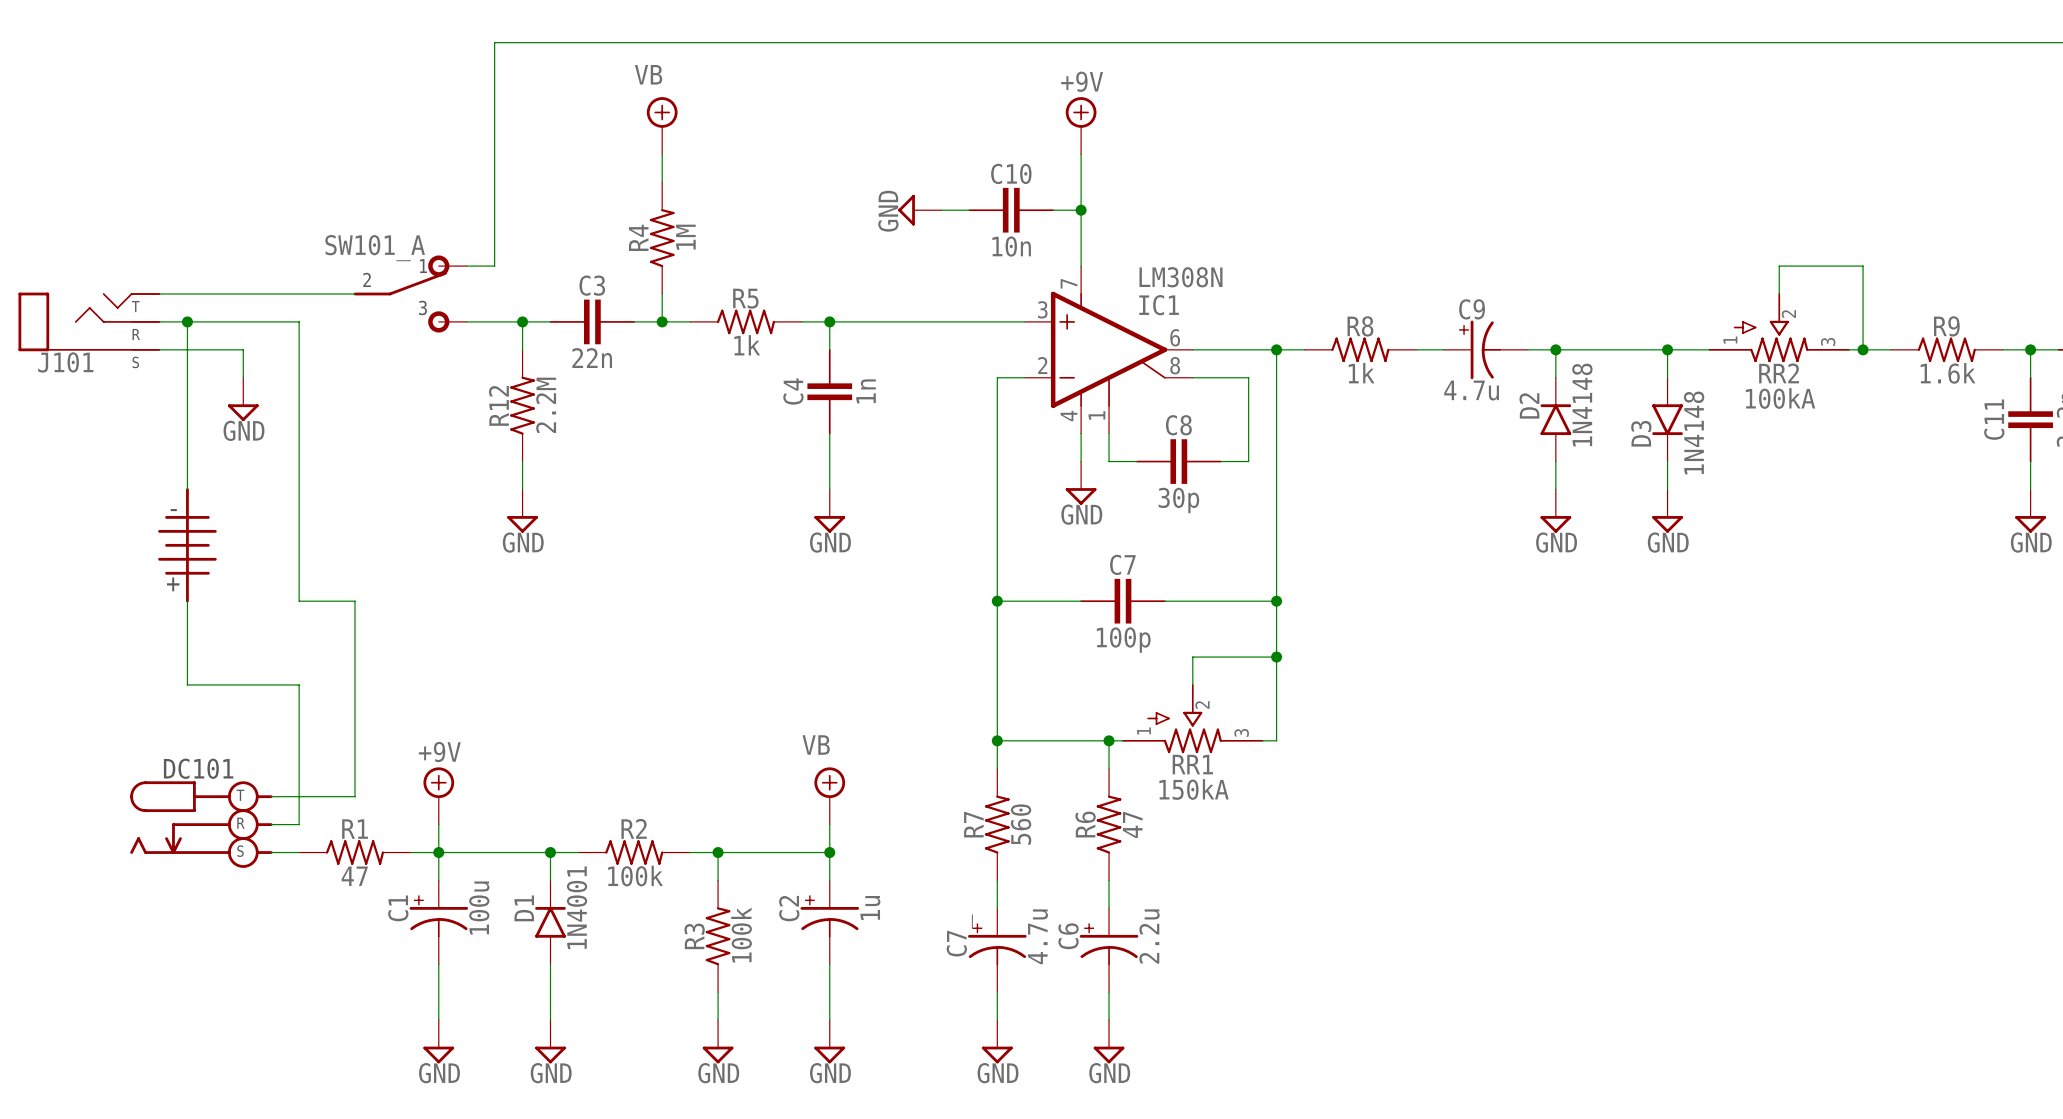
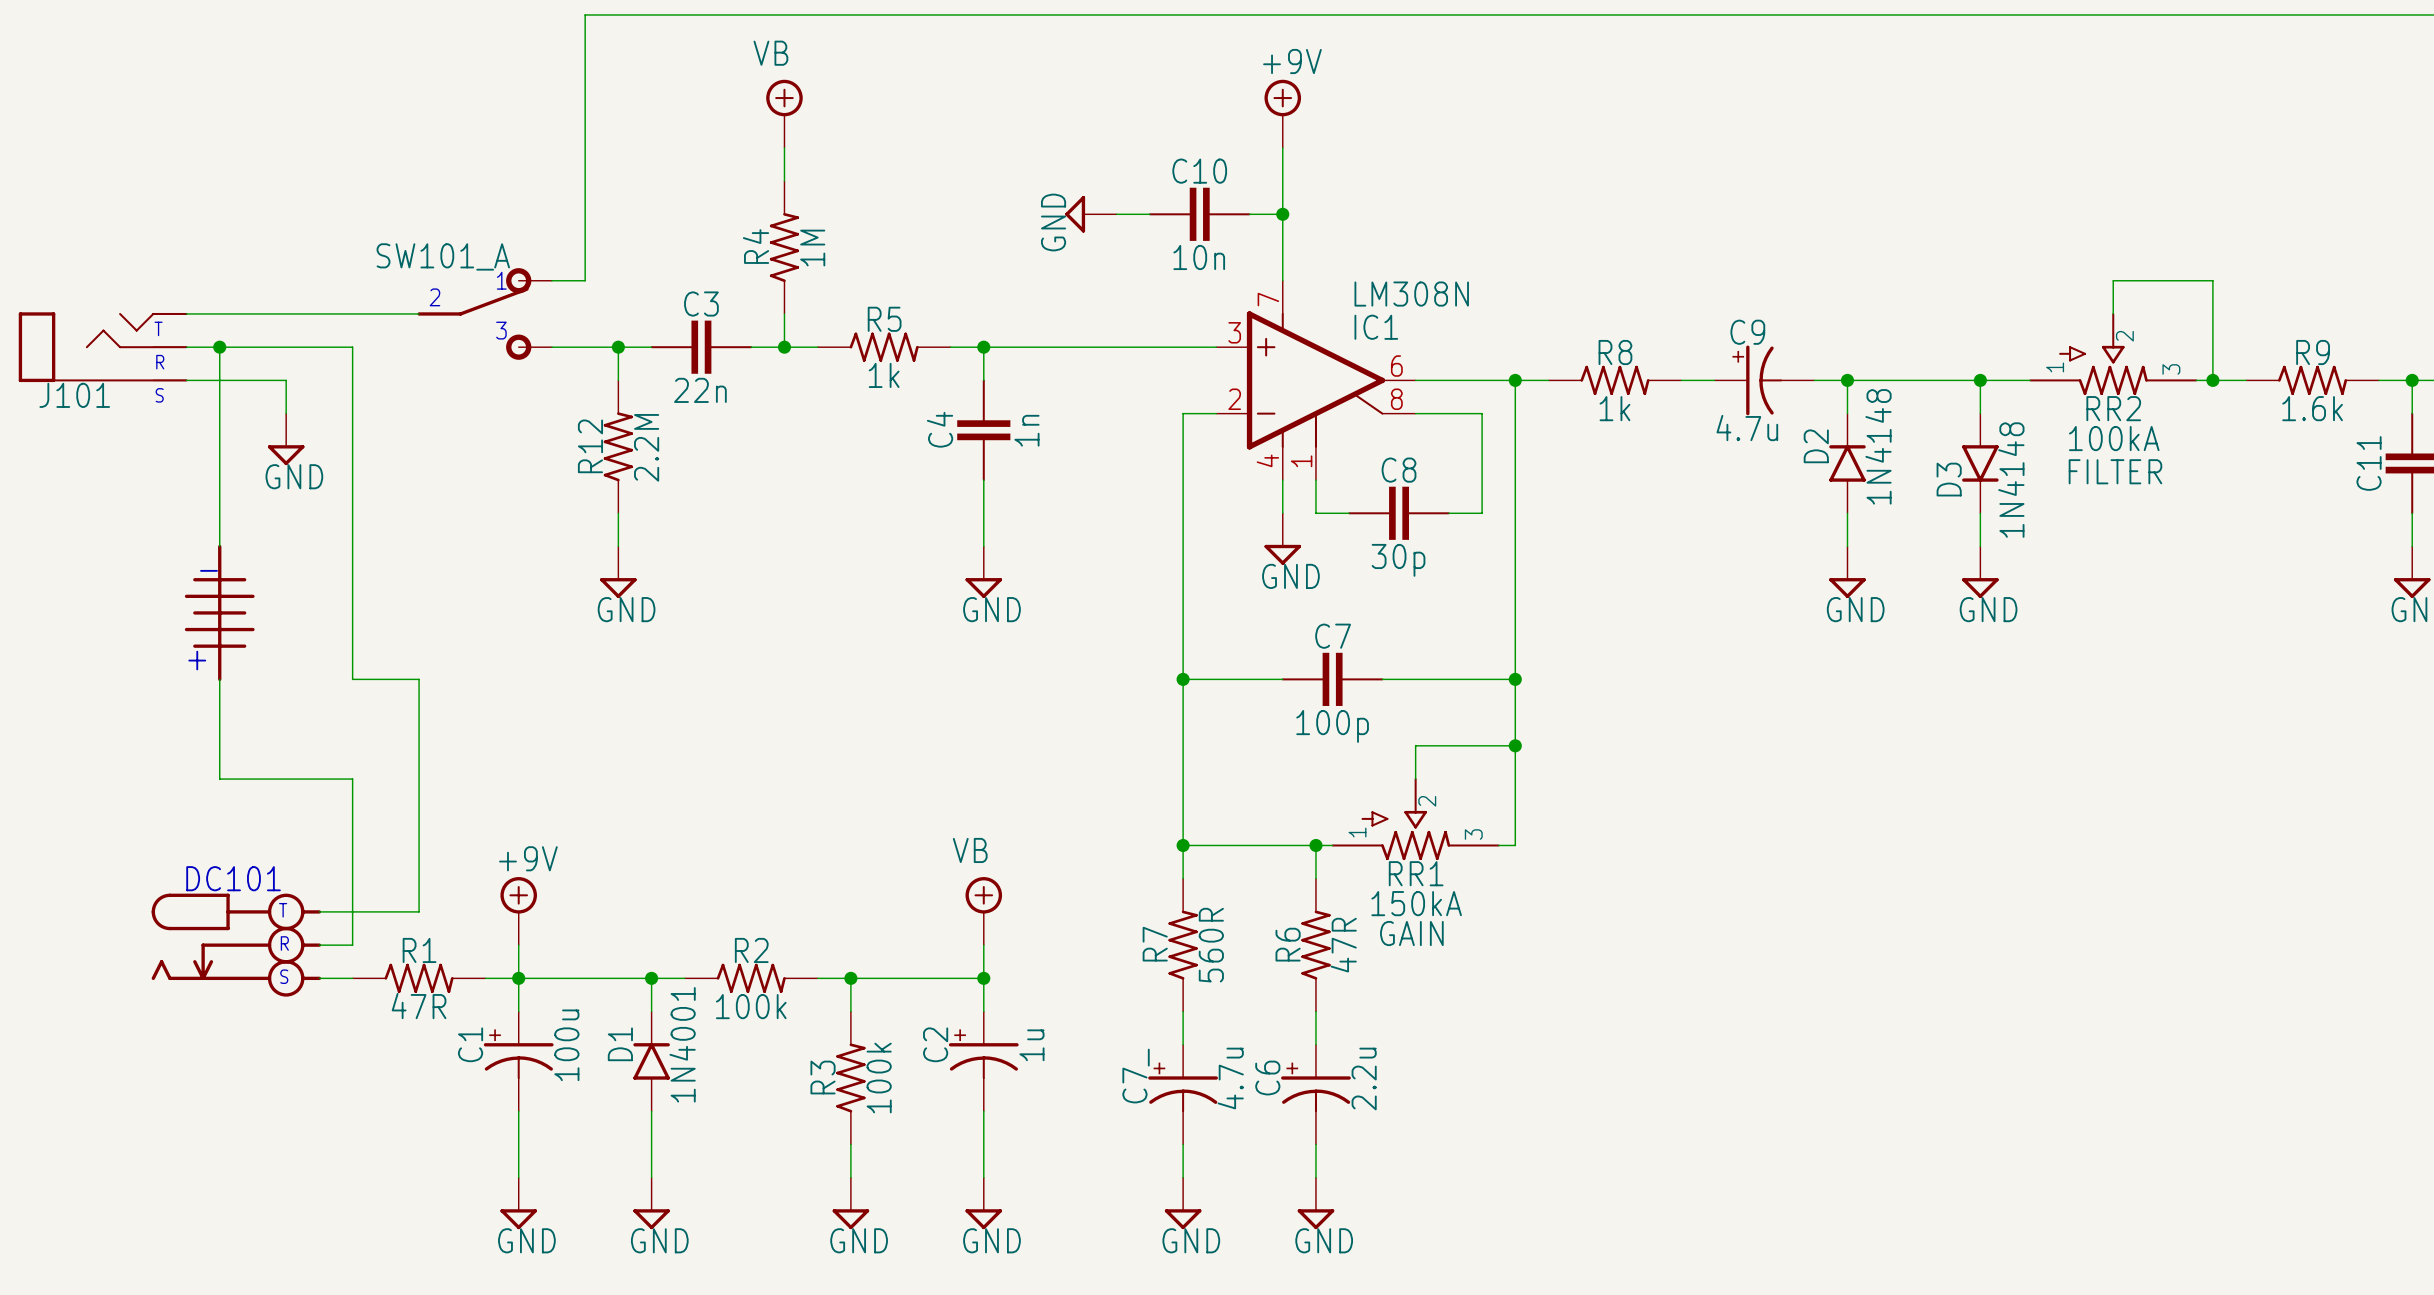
text: none -> FILTER (2115, 471)
text: none -> GAIN (1411, 933)
R7 value: 560 (1021, 824) -> 560R (1211, 945)
R6 value: 47 (1132, 824) -> 47R (1343, 945)
R1 value: 47 (354, 876) -> 47R (419, 1006)

